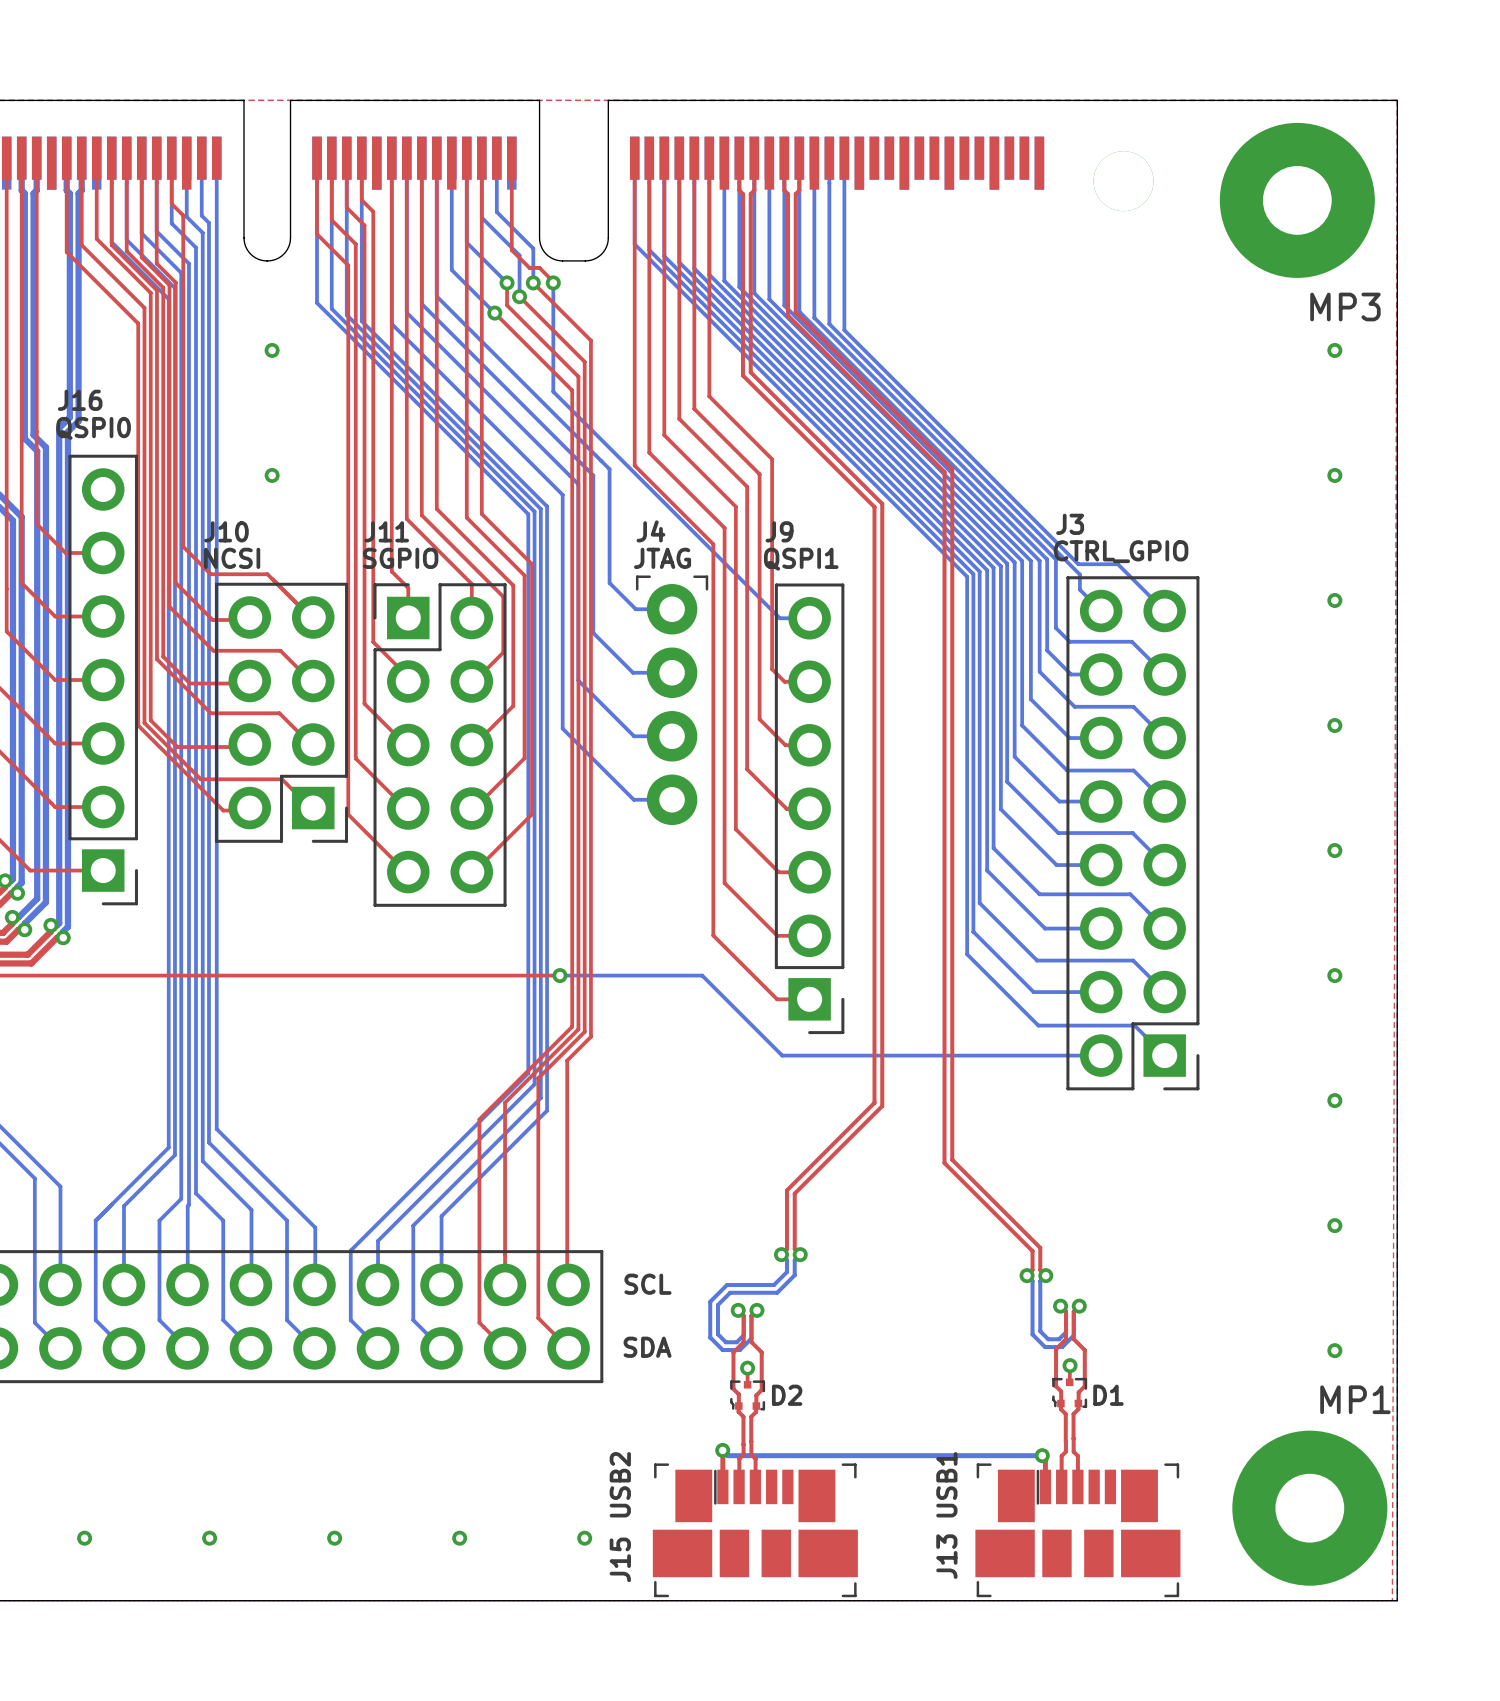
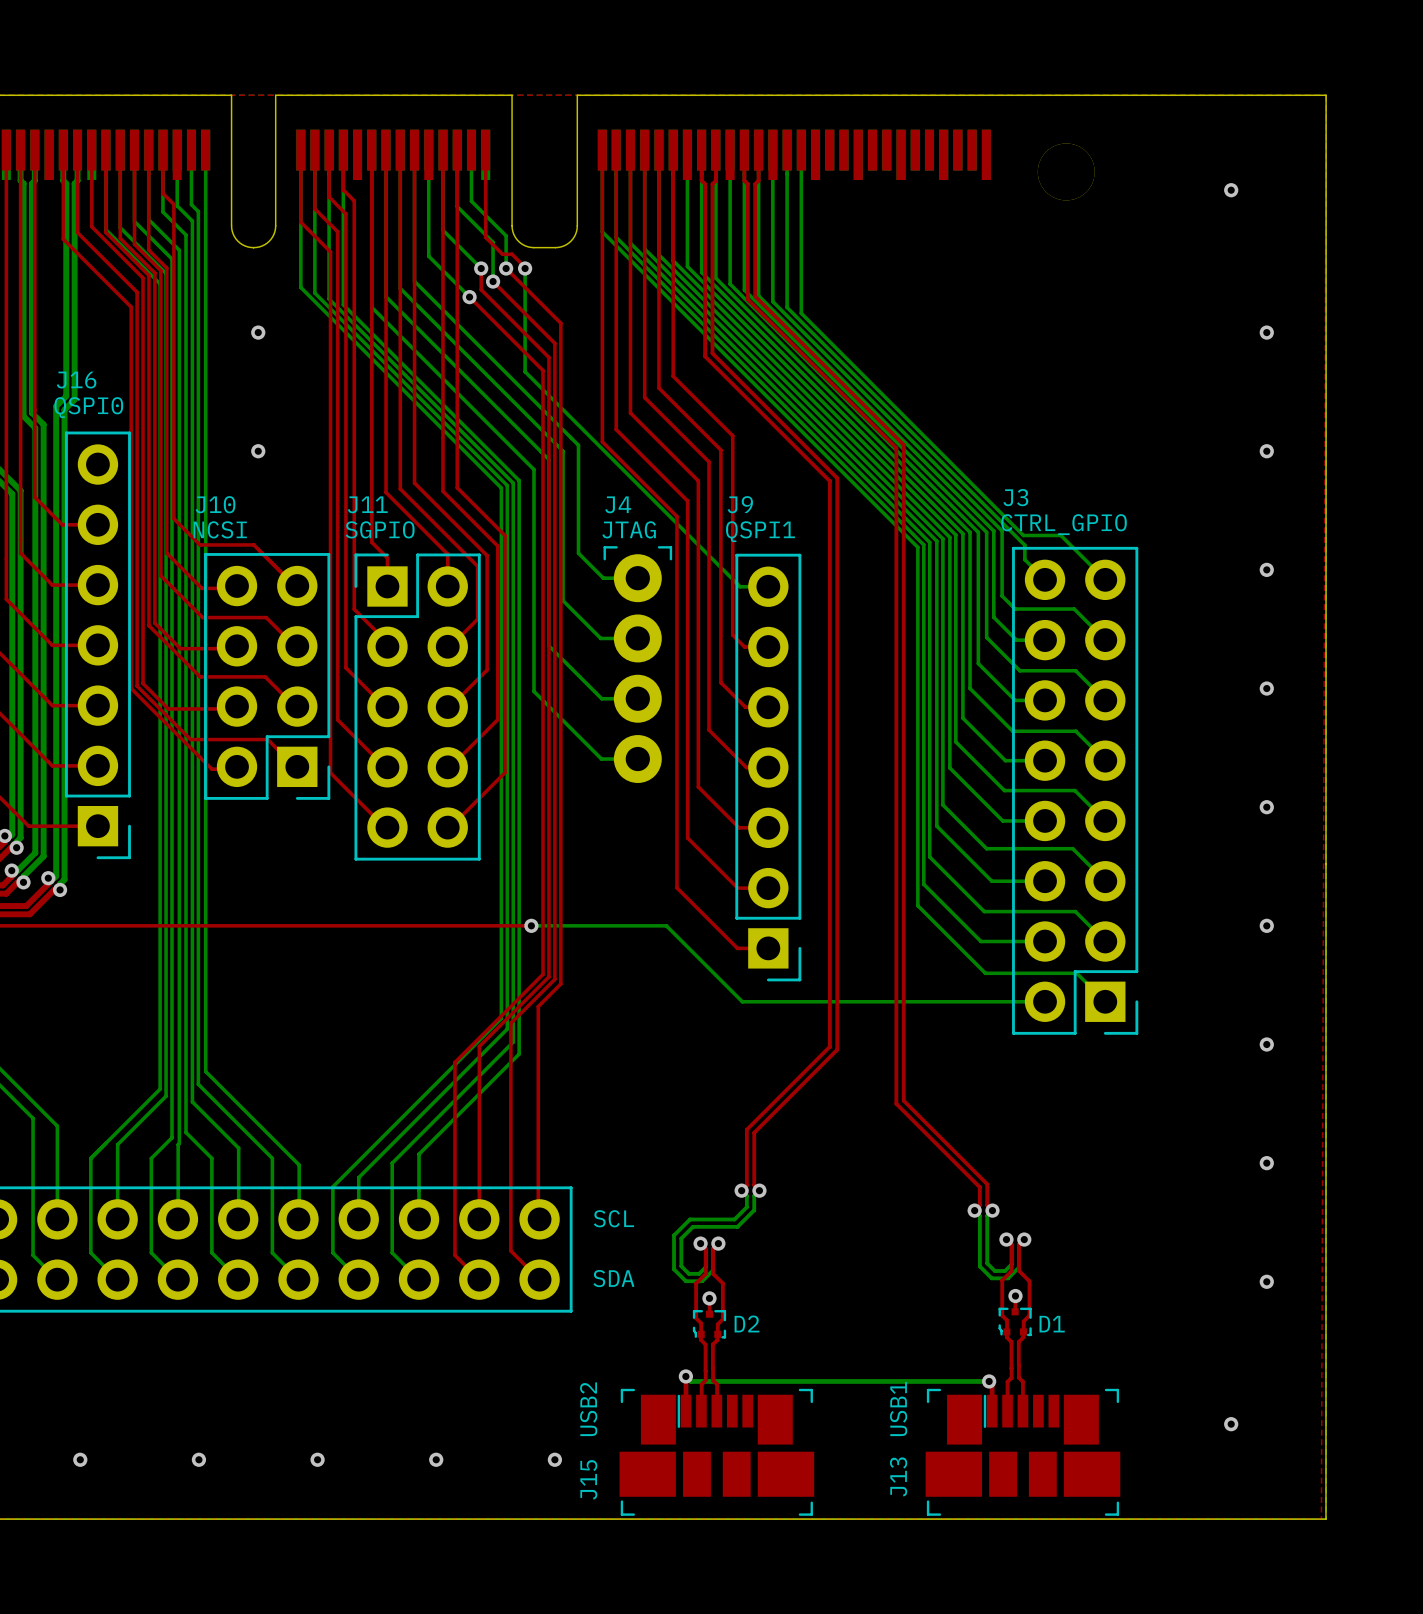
MP3: (1297, 200) -> none
via: none -> (1231, 190)
via: none -> (1231, 1424)
MP1: (1309, 1508) -> none

